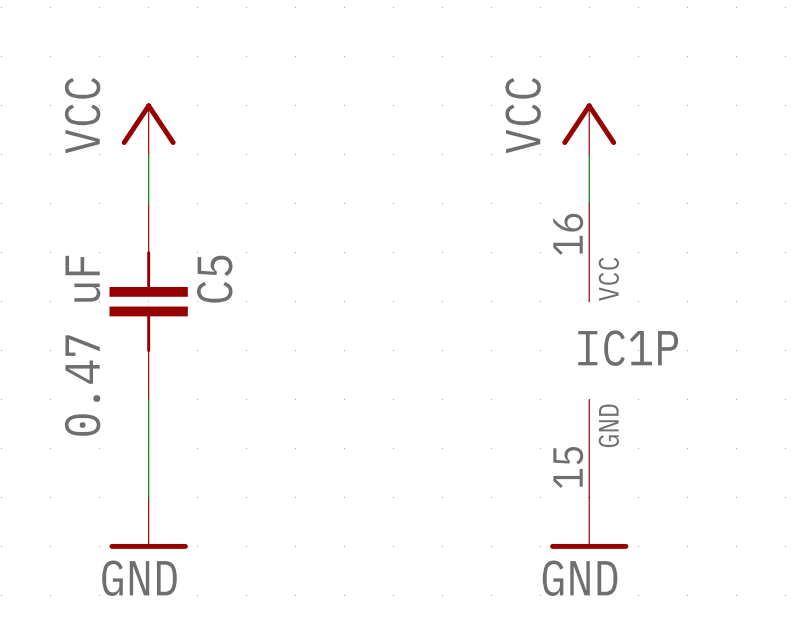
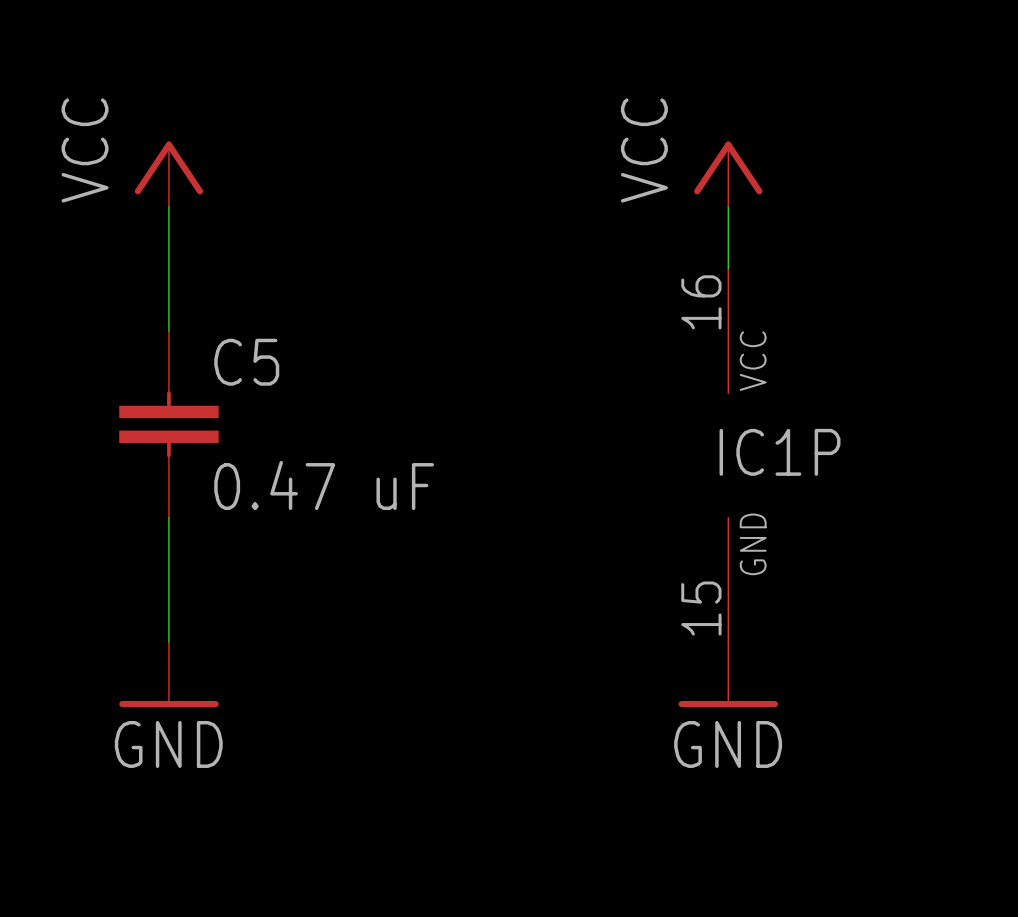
C5 symbol: [109, 203, 188, 400] -> [119, 331, 219, 518]
C5 value position: 0.47 uF (82, 345) -> 0.47 uF (324, 485)

